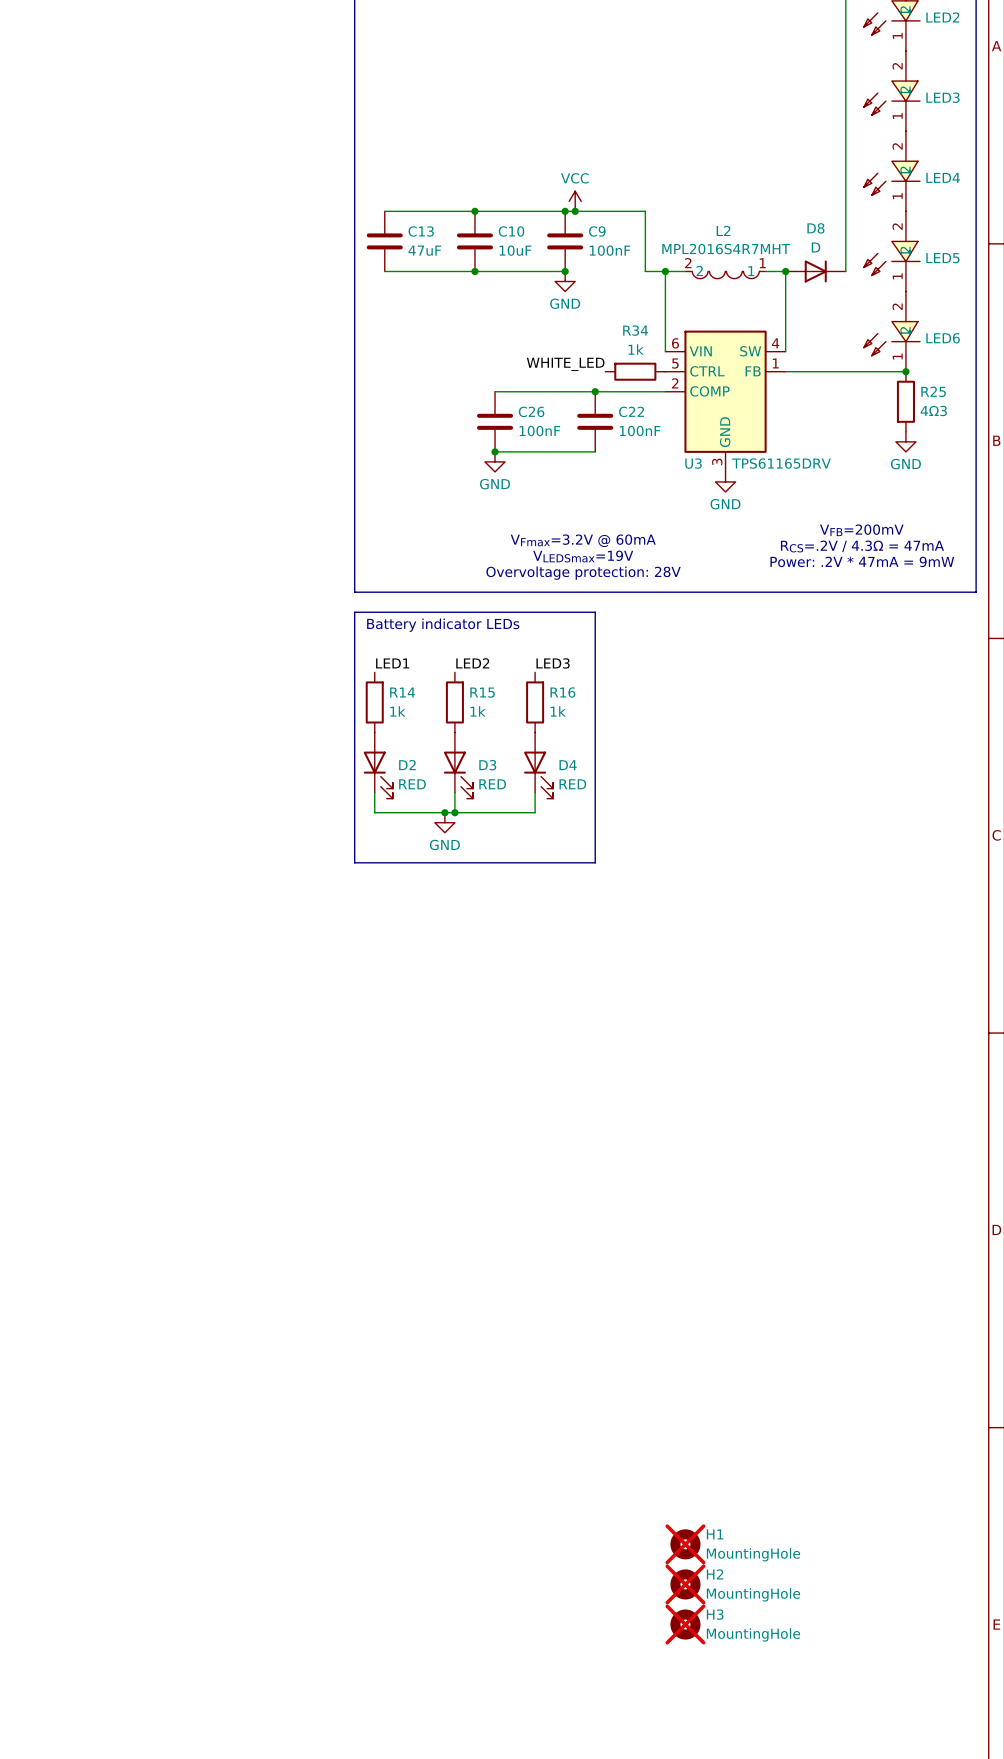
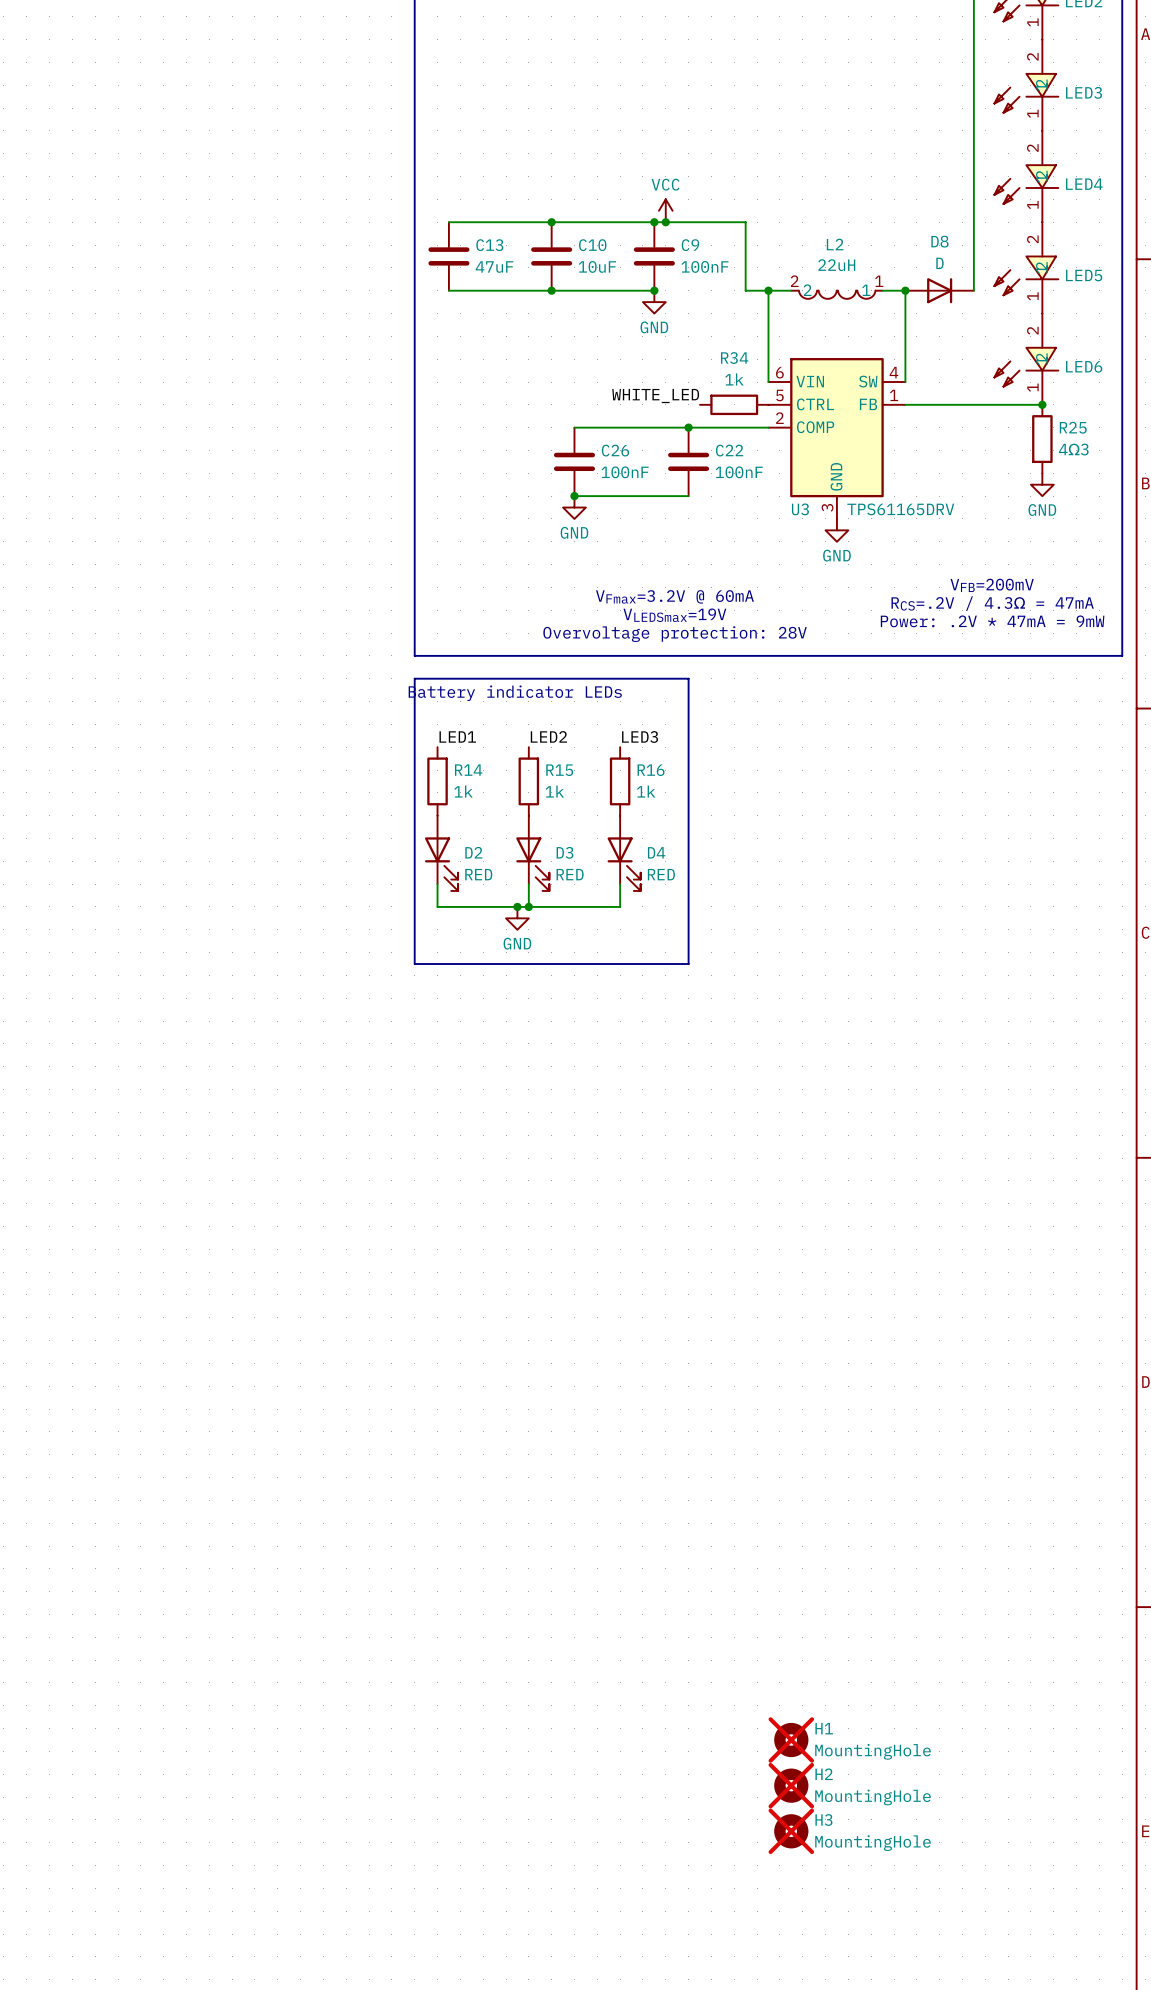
L2 value: MPL2016S4R7MHT (726, 249) -> 22uH (836, 265)

